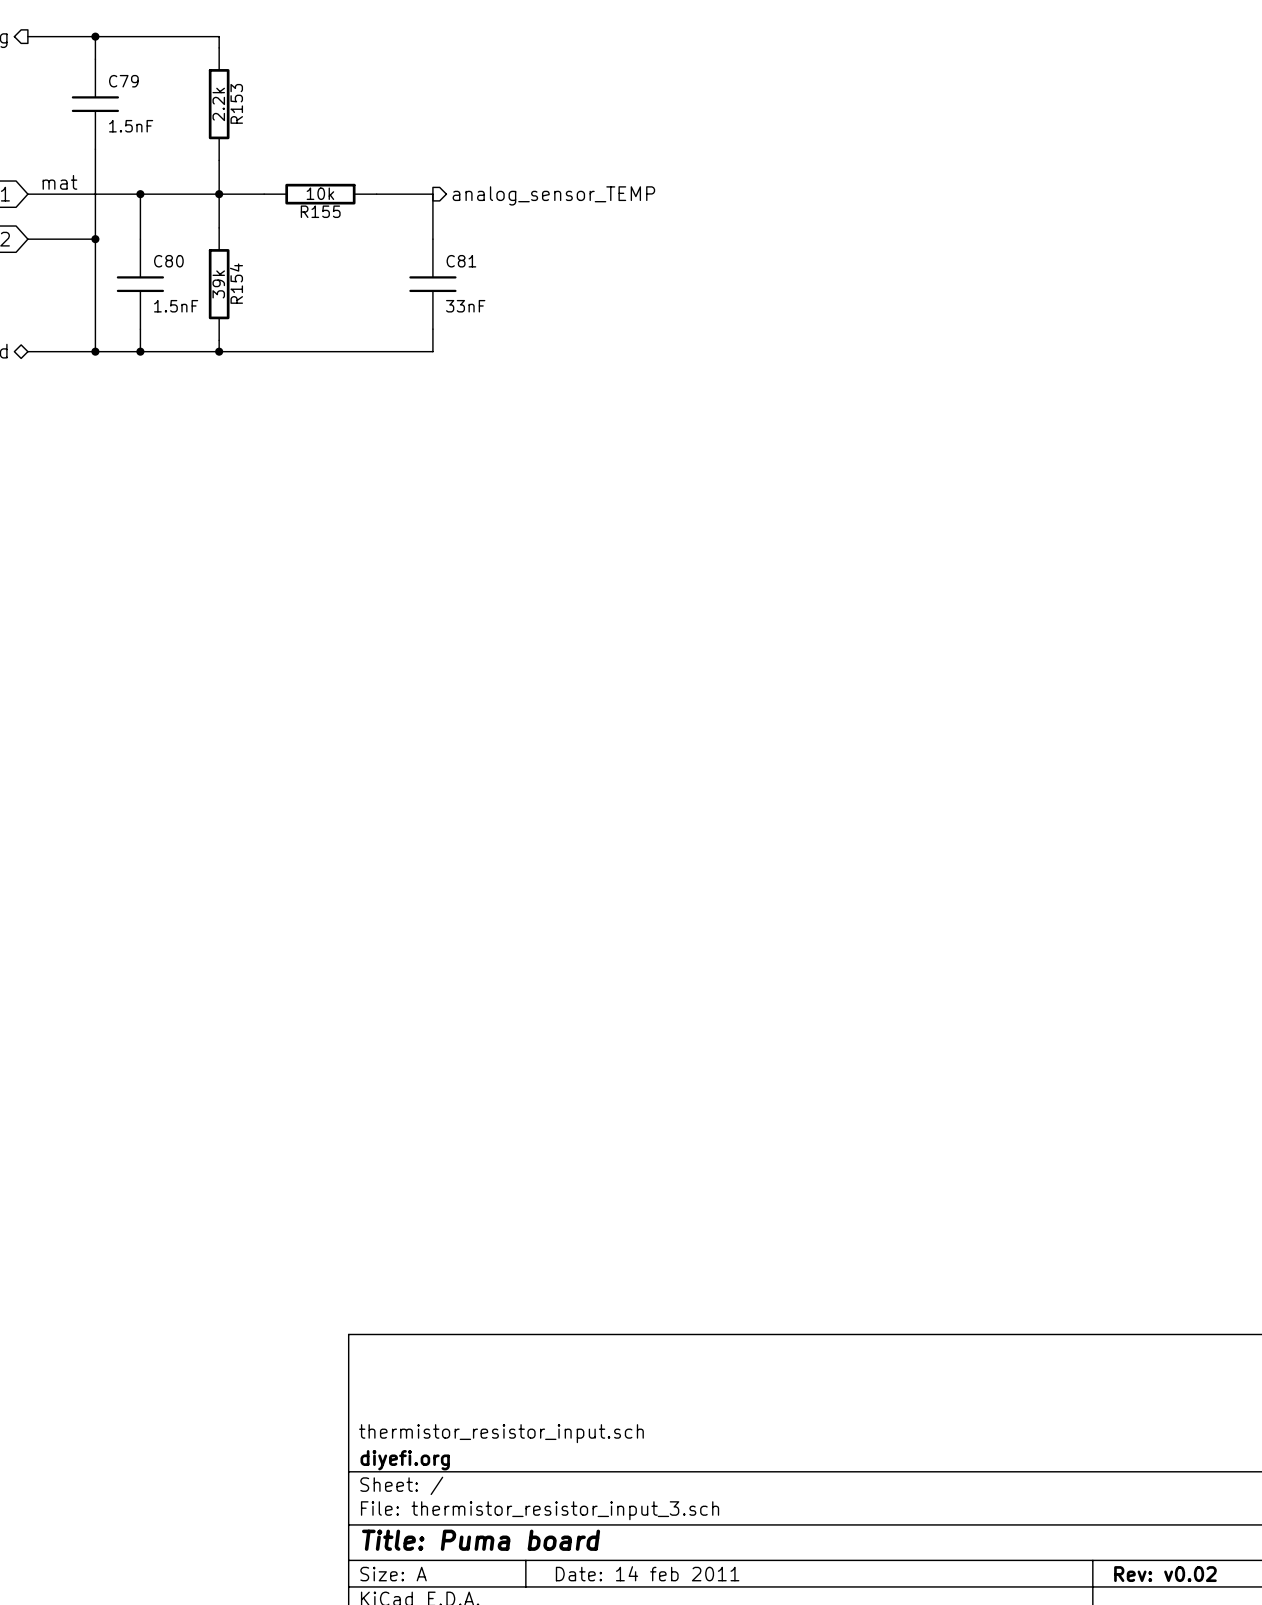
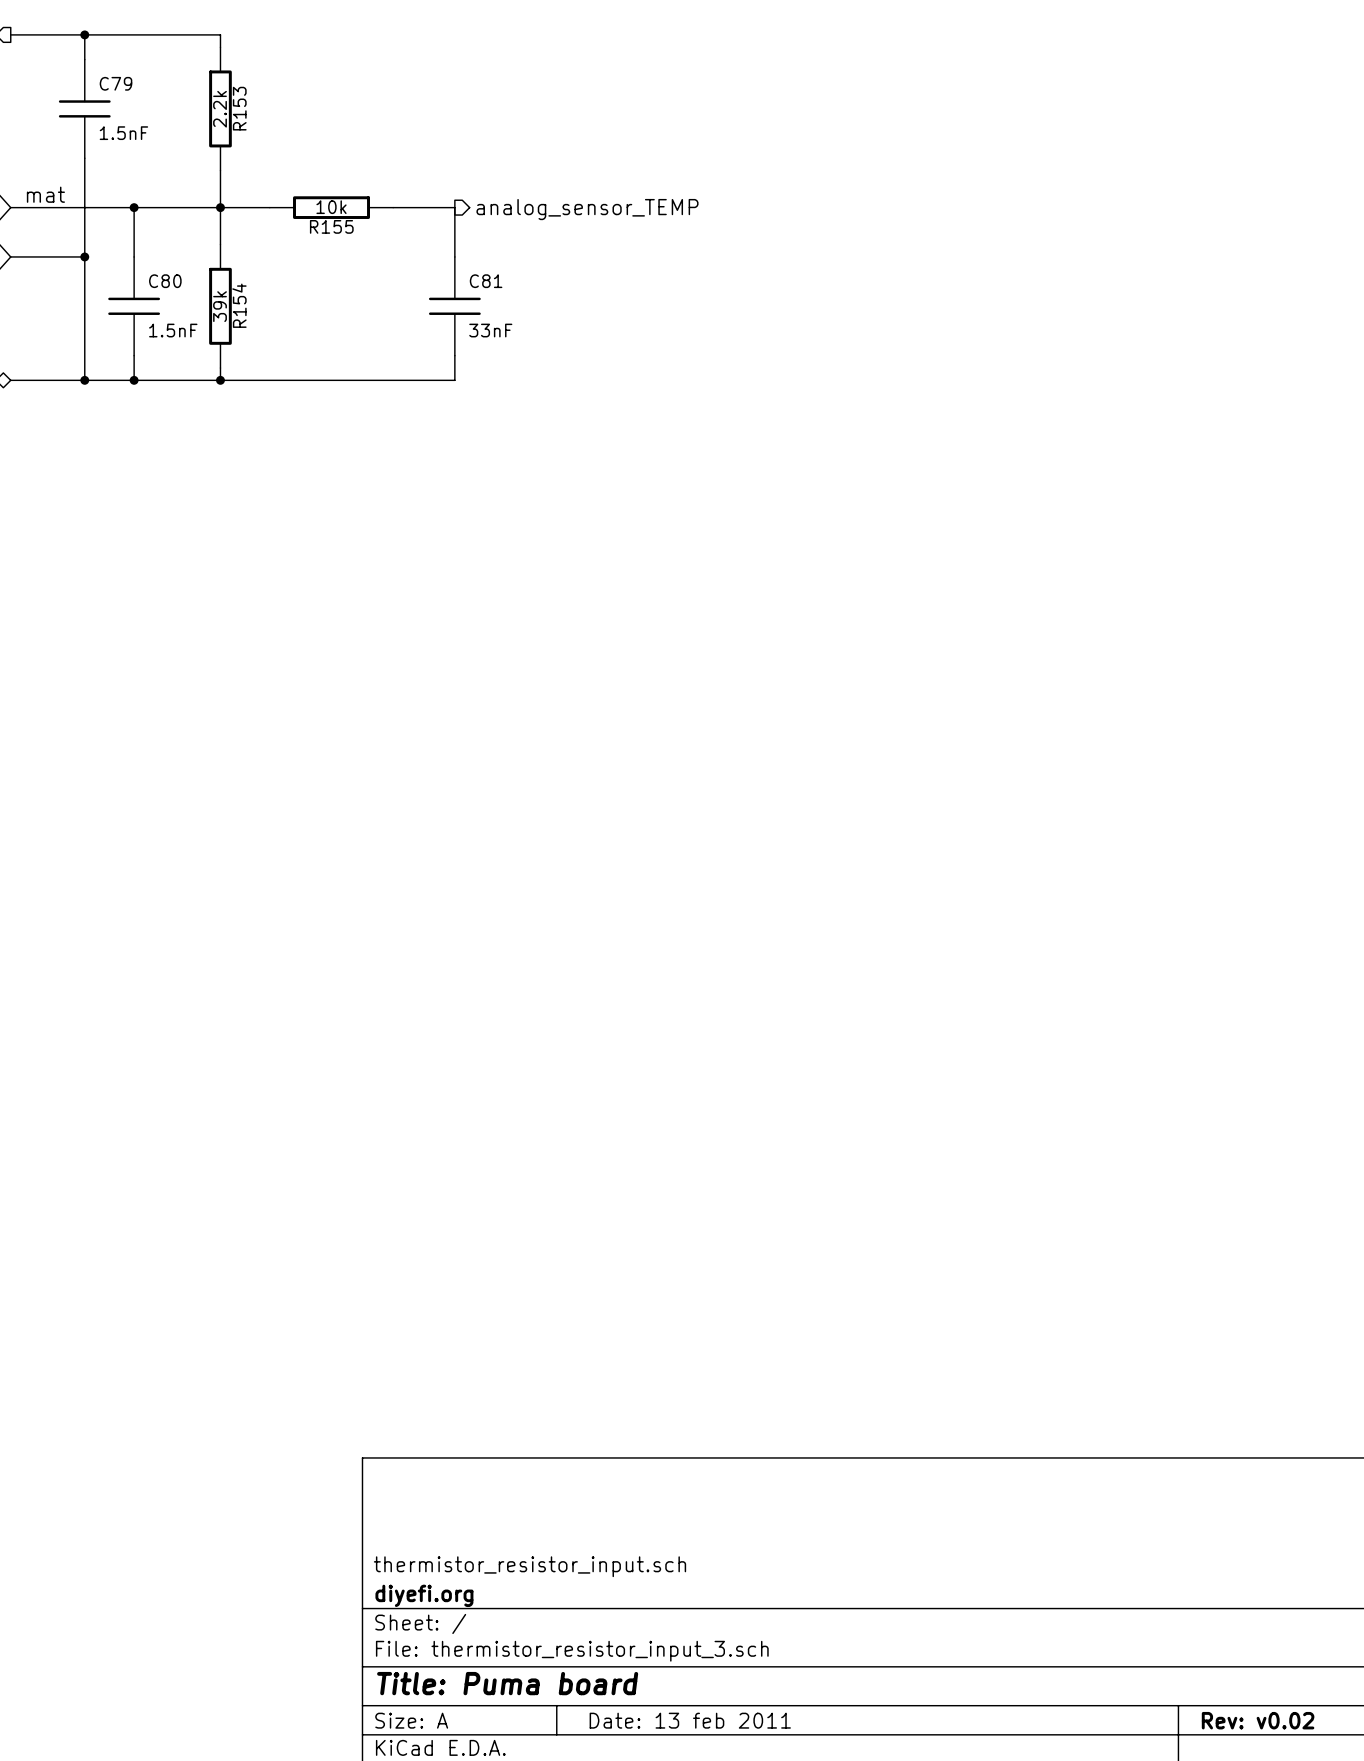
title block: Date: 14 feb 2011 (647, 1573) -> Date: 13 feb 2011 (690, 1720)

